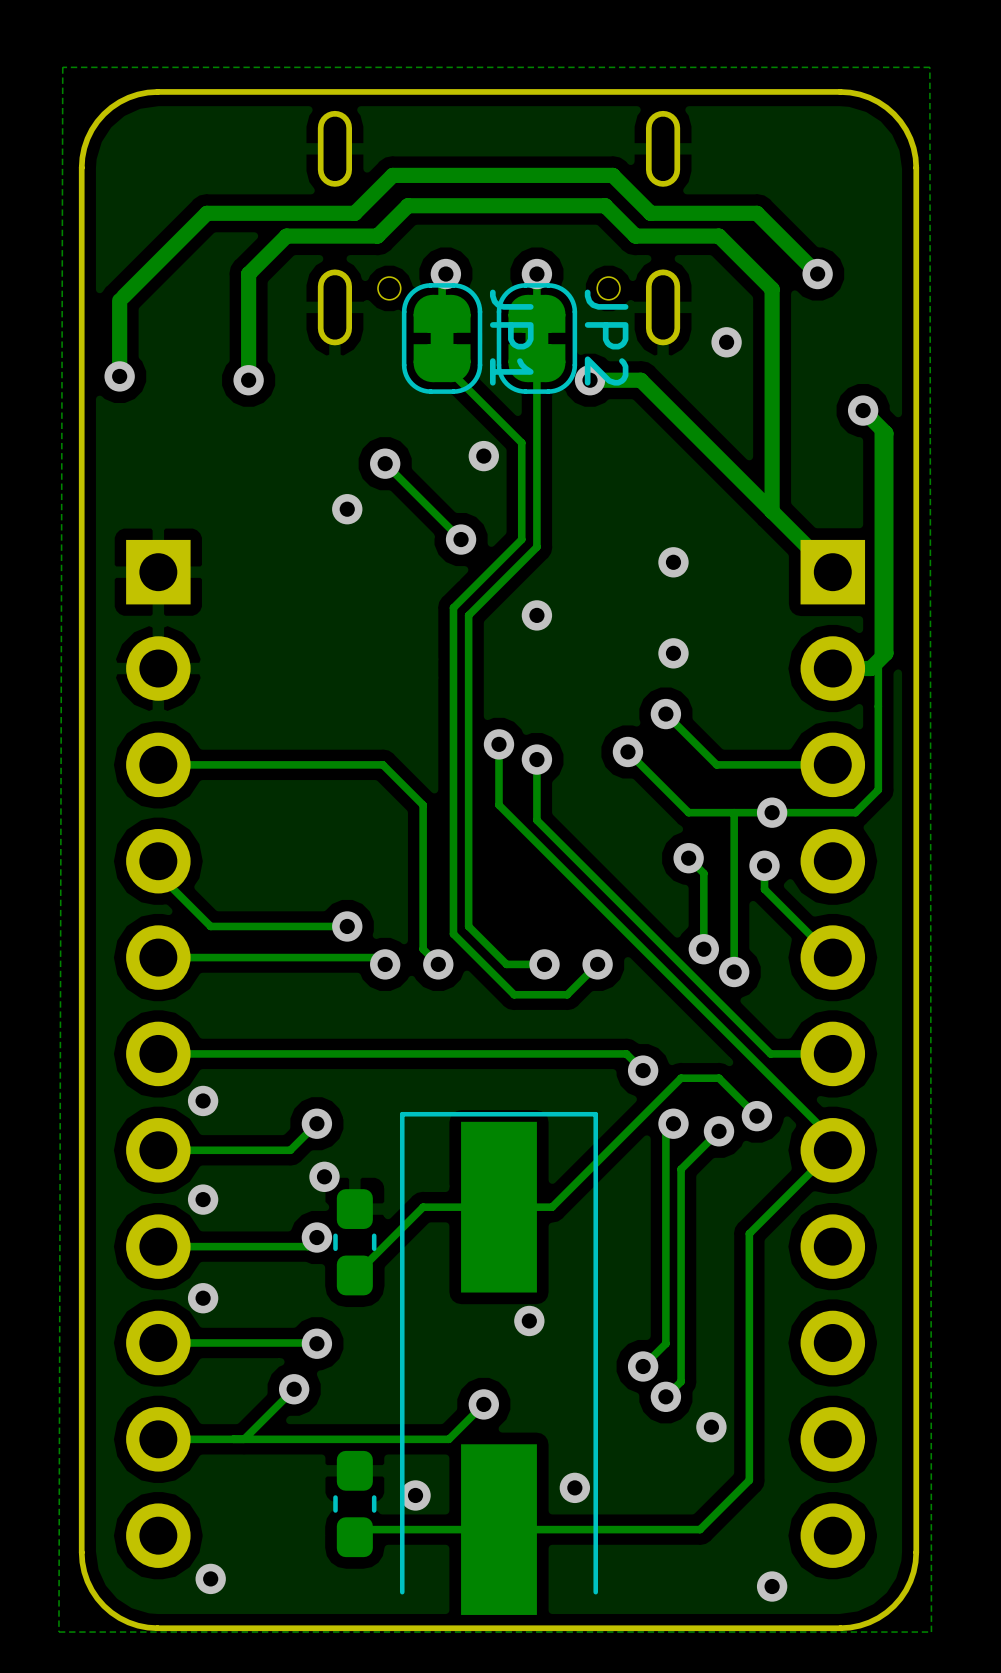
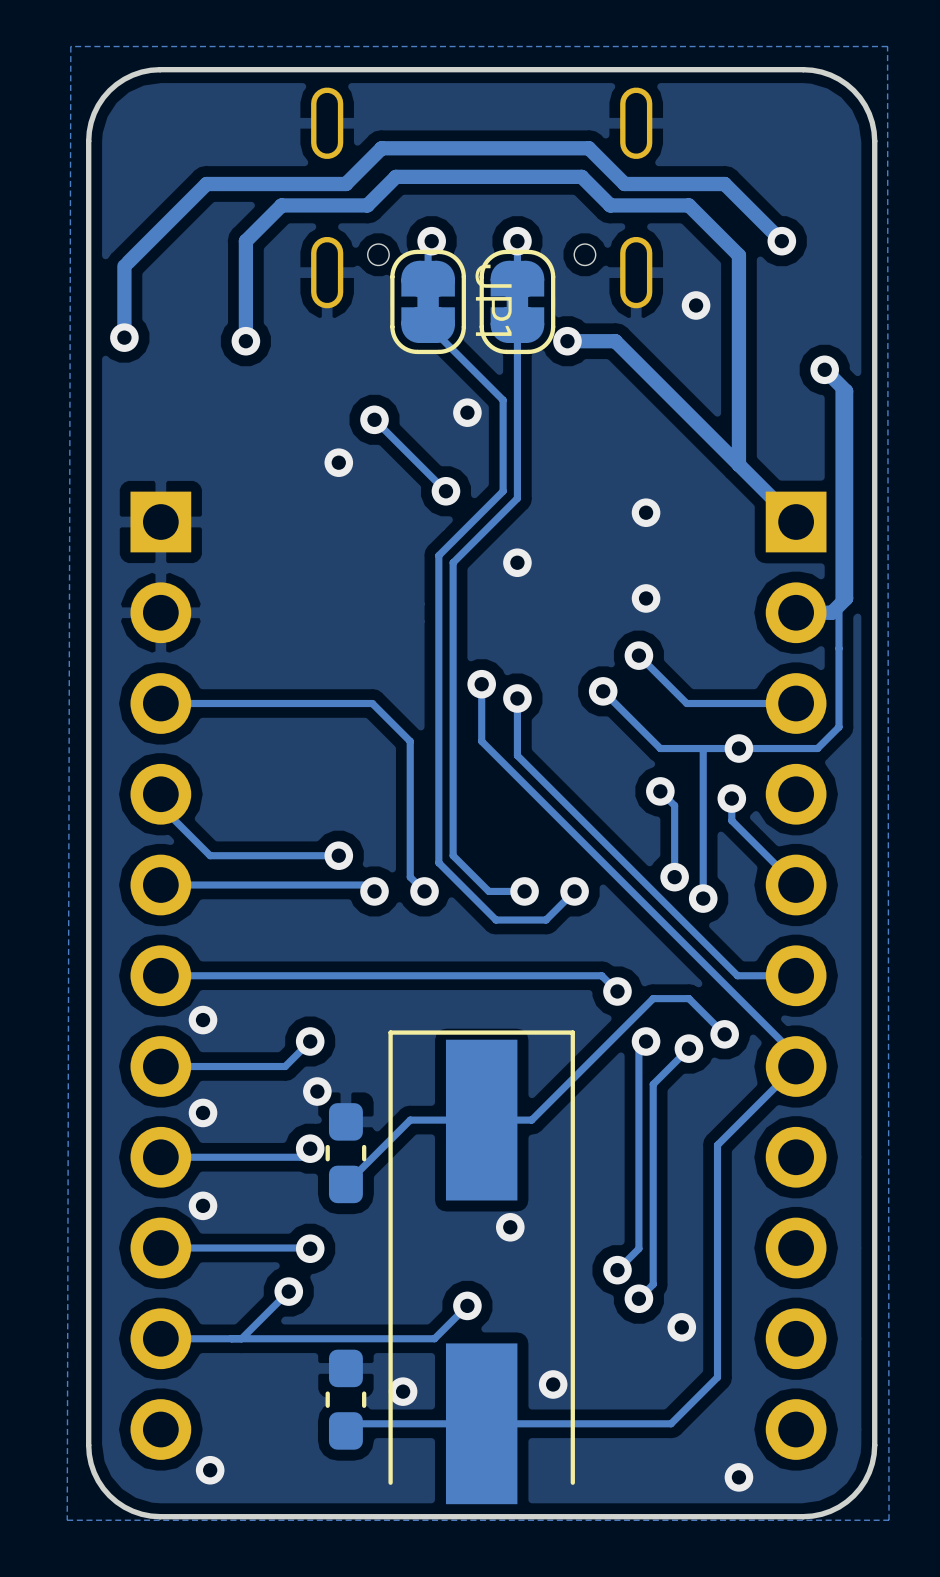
JP2 name: JP2 (606, 337) -> none

